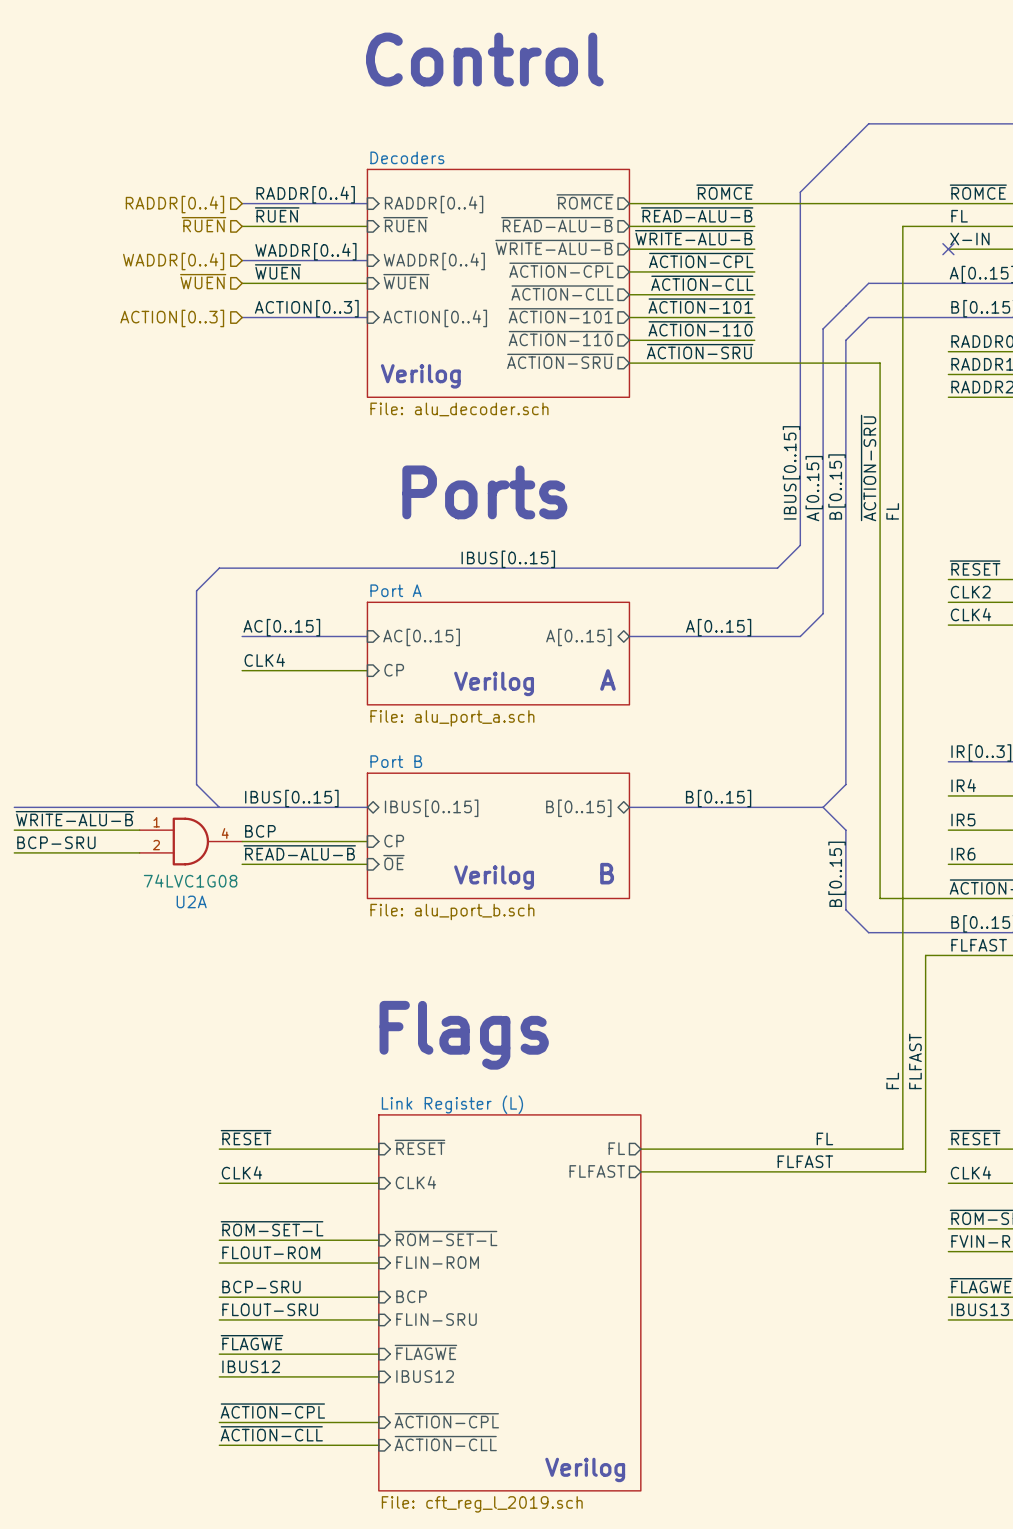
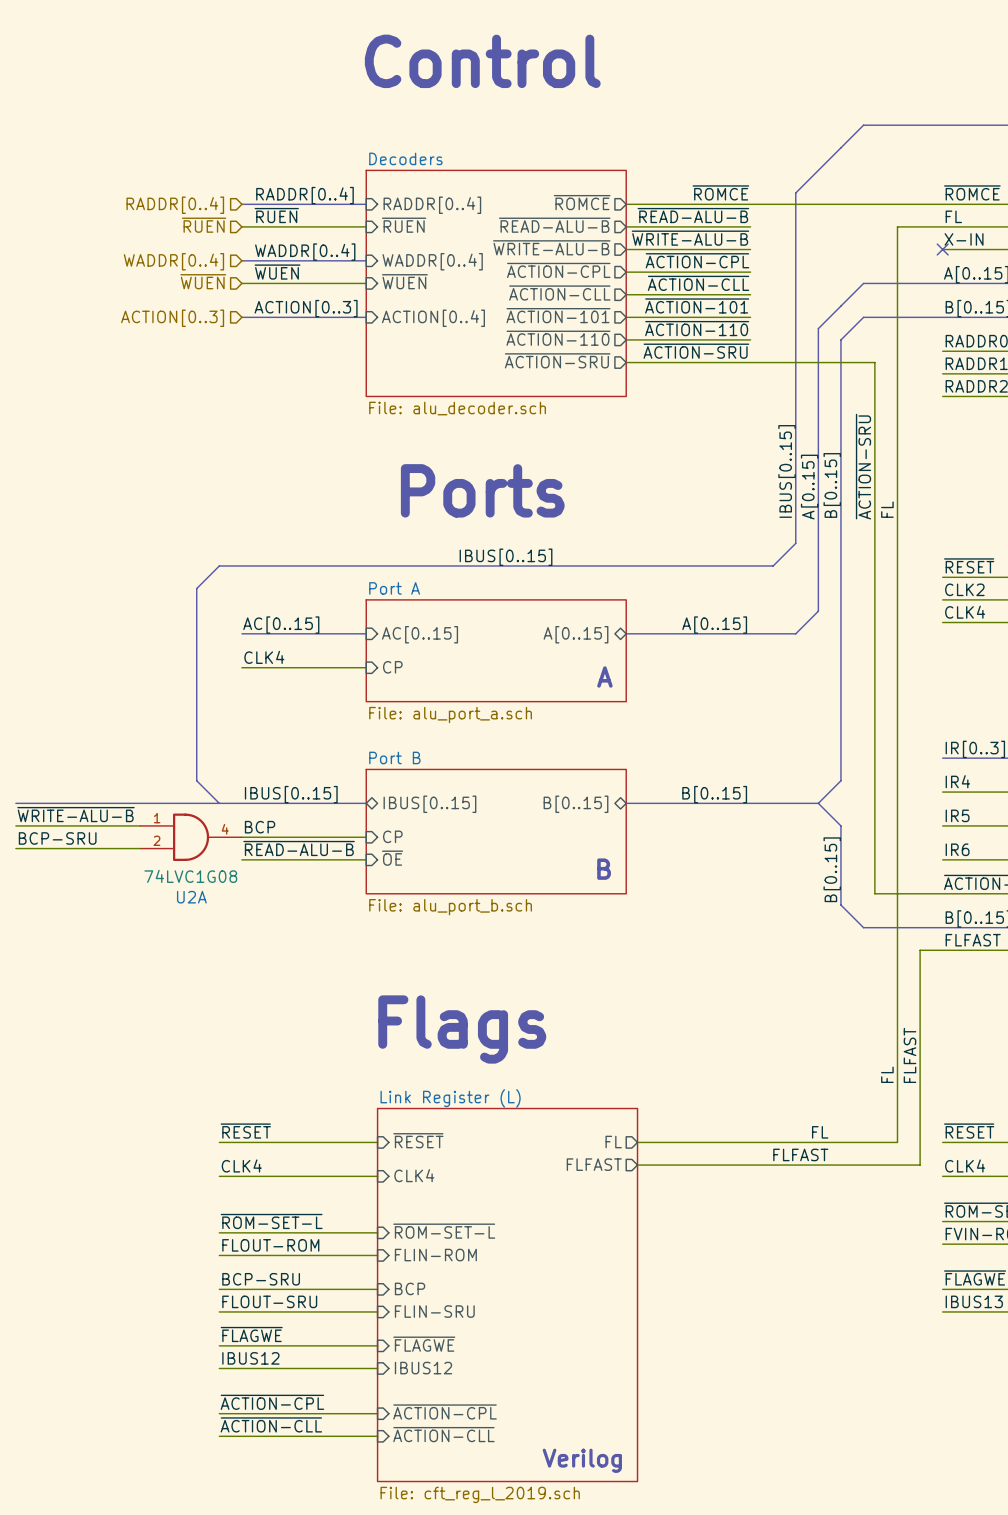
text: Verilog (420, 376) -> none
text: Verilog (494, 683) -> none
text: Verilog (494, 877) -> none

